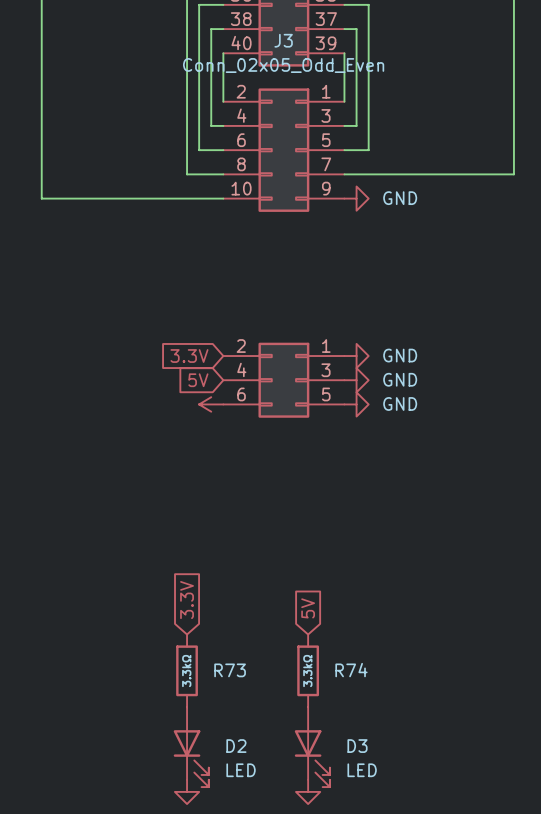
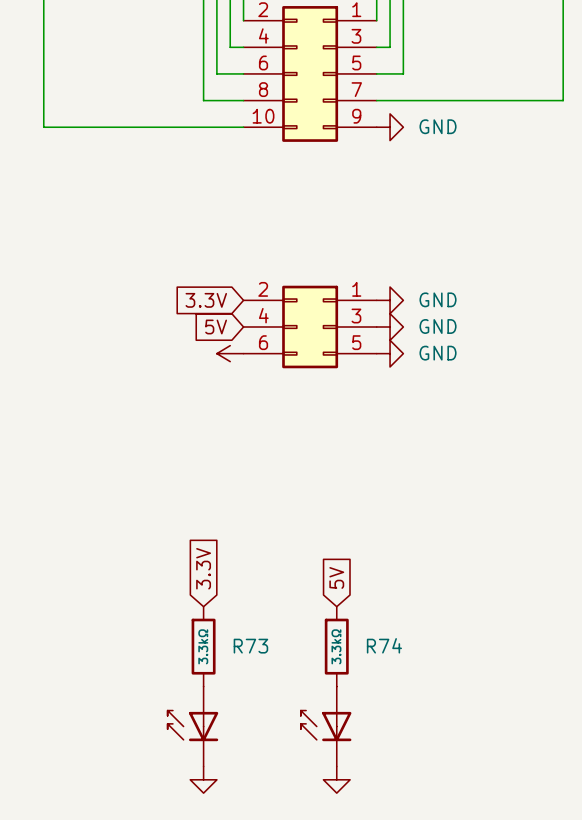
part: none -> (192, 726)
part: none -> (325, 726)
D2: LED (191, 747) -> none
D3: LED (312, 747) -> none

